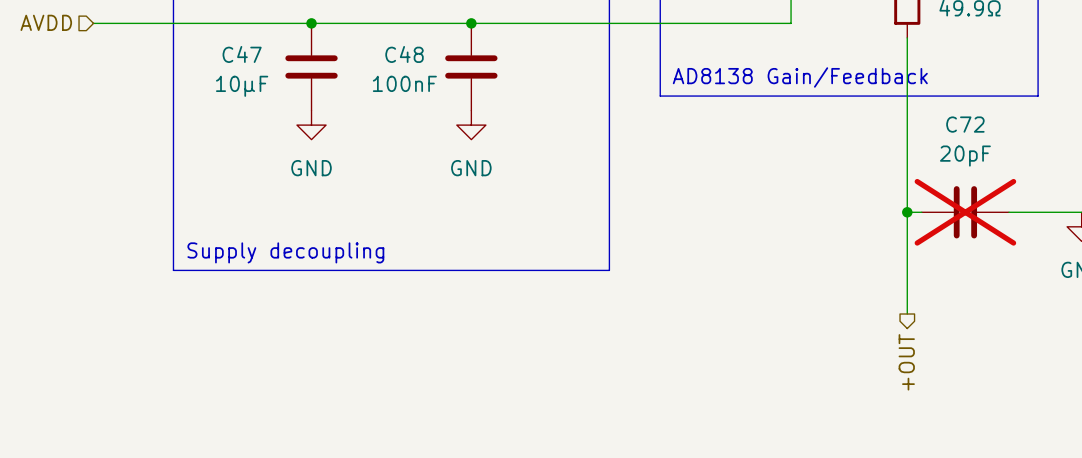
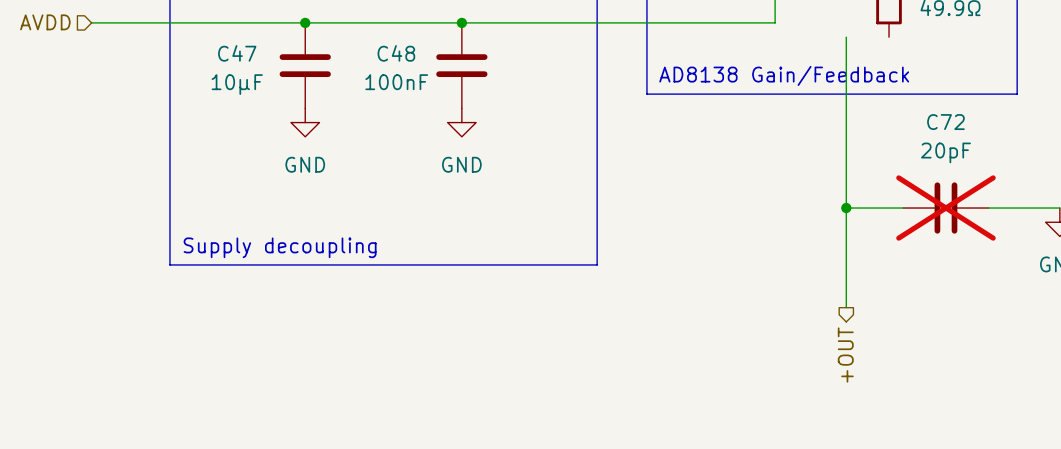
wire: (907, 37) (907, 314) -> (846, 37) (846, 307)
wire: none -> (846, 208) (889, 208)
junction position: (907, 212) -> (846, 208)
hierarchical label position: +OUT (906, 362) -> +OUT (845, 355)

